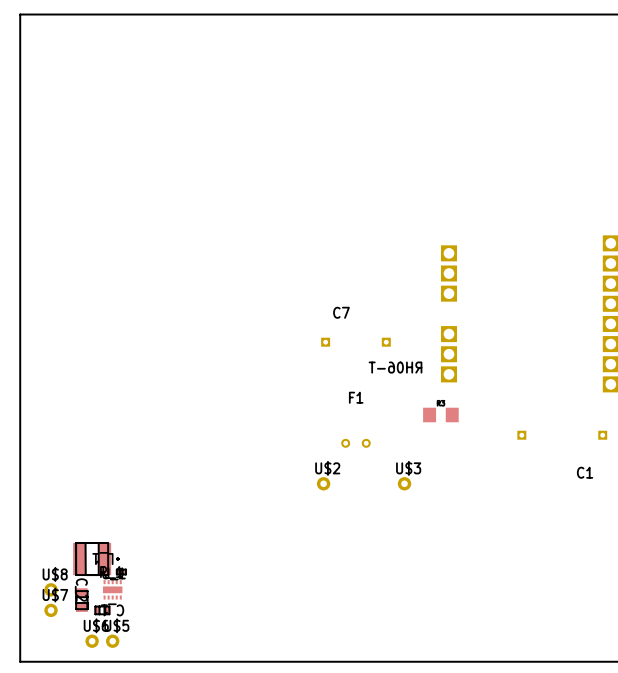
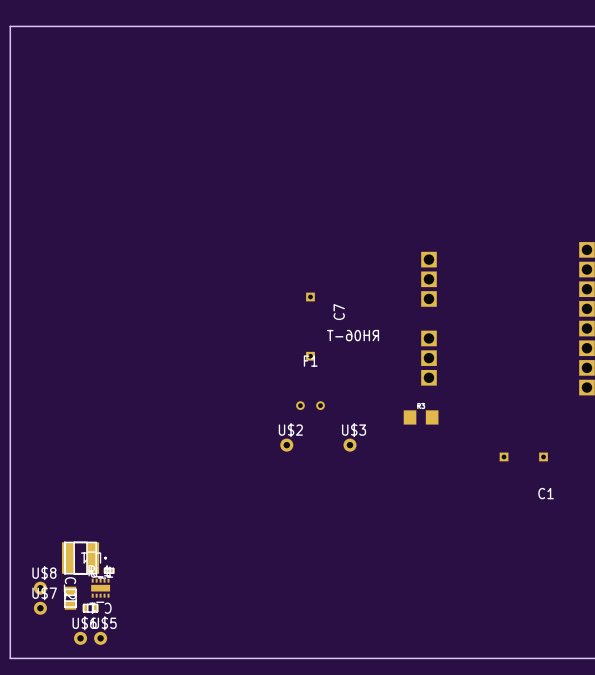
C7 rotation: 0° (355, 342) -> 90° clockwise (310, 326)
part position: (395, 367) -> (353, 335)
C1 footprint: [517, 430, 608, 440] -> [499, 452, 548, 462]
F1 position: (355, 443) -> (310, 405)
U$2 position: (323, 483) -> (286, 445)
U$3 position: (404, 483) -> (349, 445)

